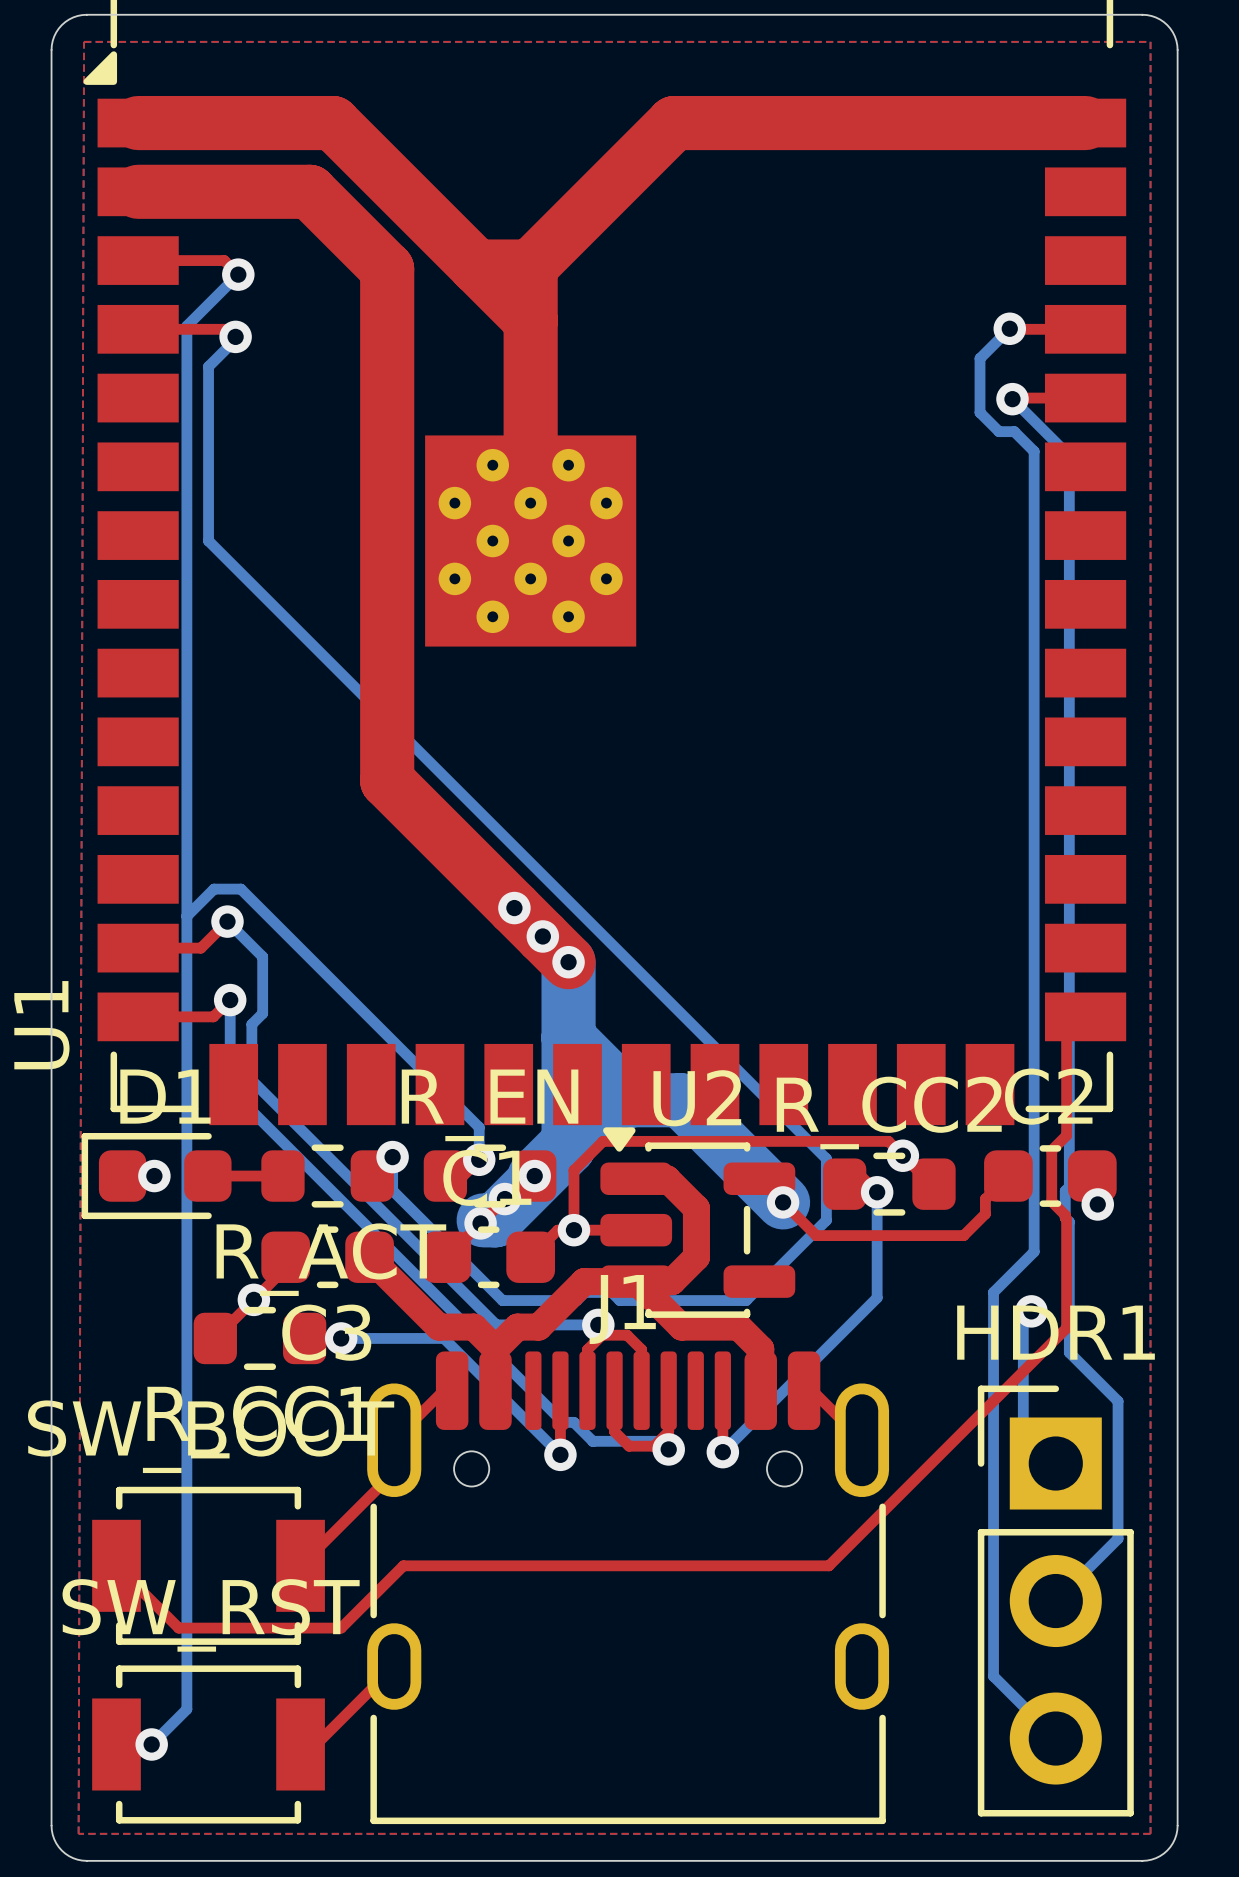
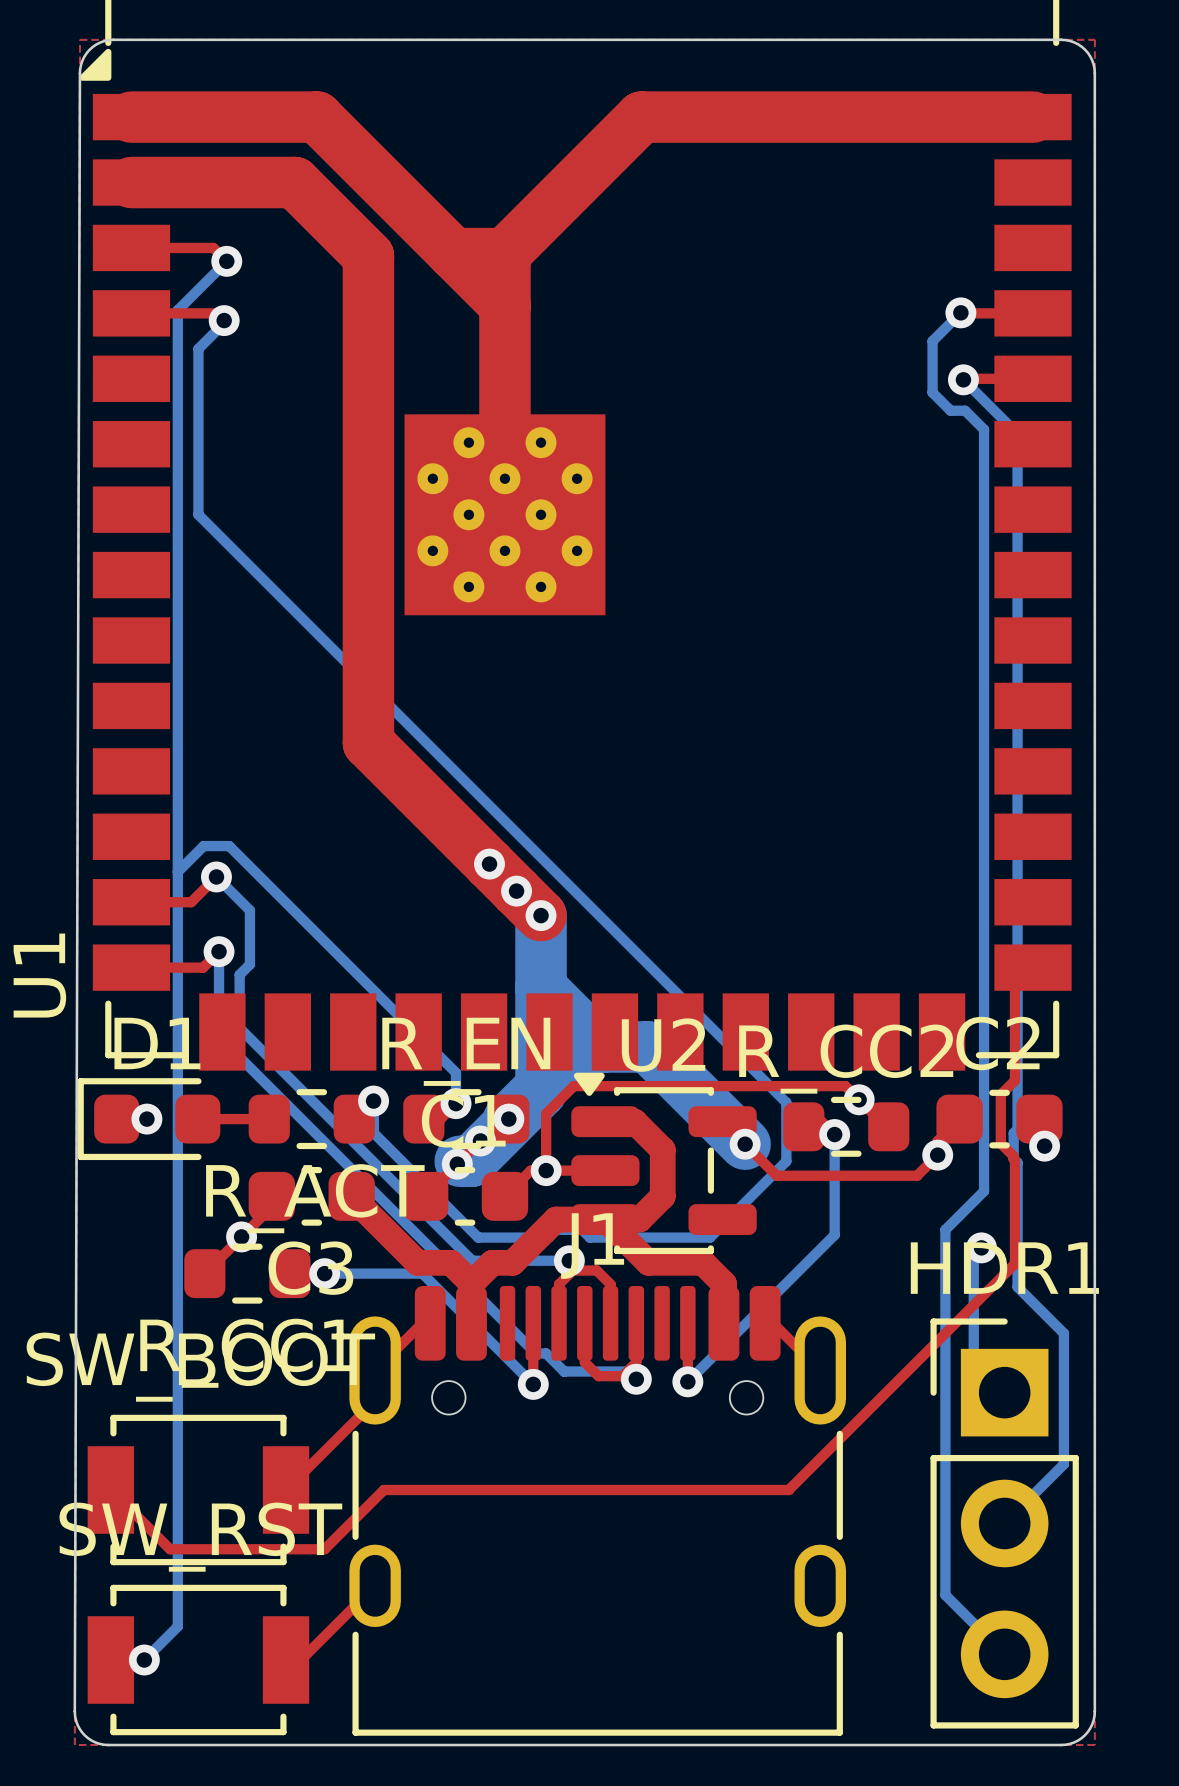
board edge: (86, 14) (1142, 14) (1160, 19) (1172, 32) (1177, 49) (1177, 1825) (1172, 1843) (1160, 1856) (1142, 1860) (86, 1860) (69, 1856) (56, 1843) (51, 1825) (51, 49) (54, 36) (61, 25) (73, 17) (86, 14) -> (113, 39) (100, 42) (89, 49) (82, 60) (79, 73) (74, 1711) (79, 1728) (91, 1740) (108, 1745) (1061, 1745) (1078, 1740) (1090, 1728) (1094, 1711) (1094, 73) (1090, 56) (1078, 44) (1061, 39) (113, 39)
via: none -> (937, 1155)

